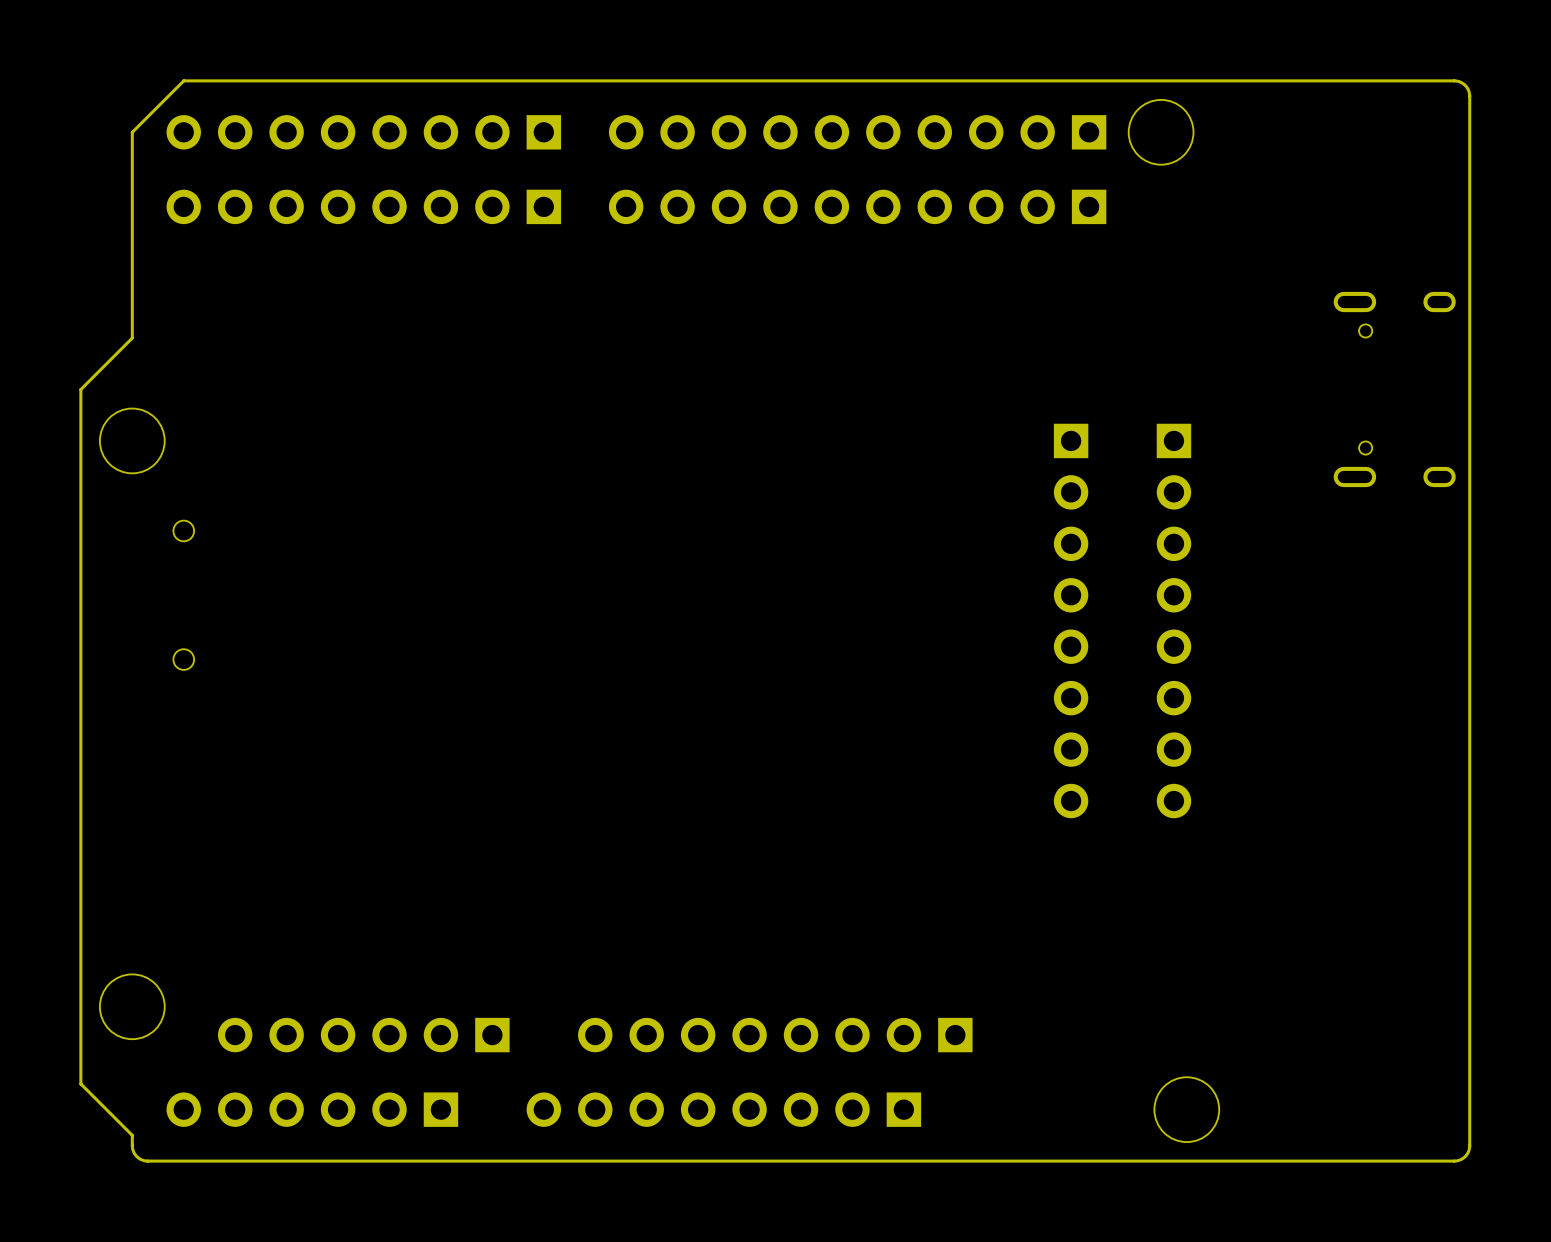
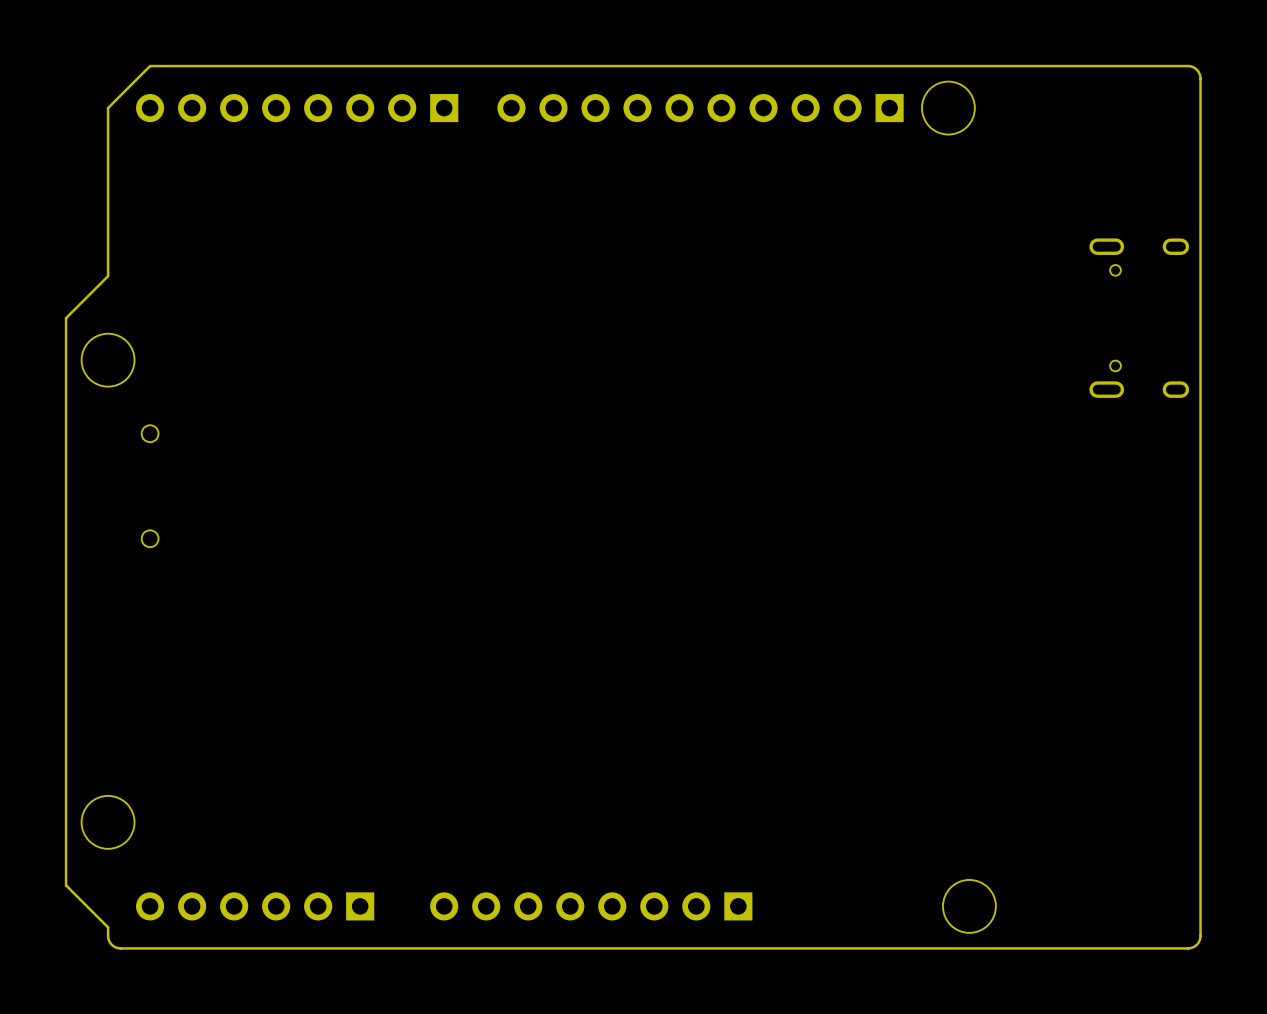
part: (363, 206) -> none
part: (857, 206) -> none
part: (1071, 620) -> none
part: (1173, 620) -> none
part: (363, 1035) -> none
part: (775, 1035) -> none

